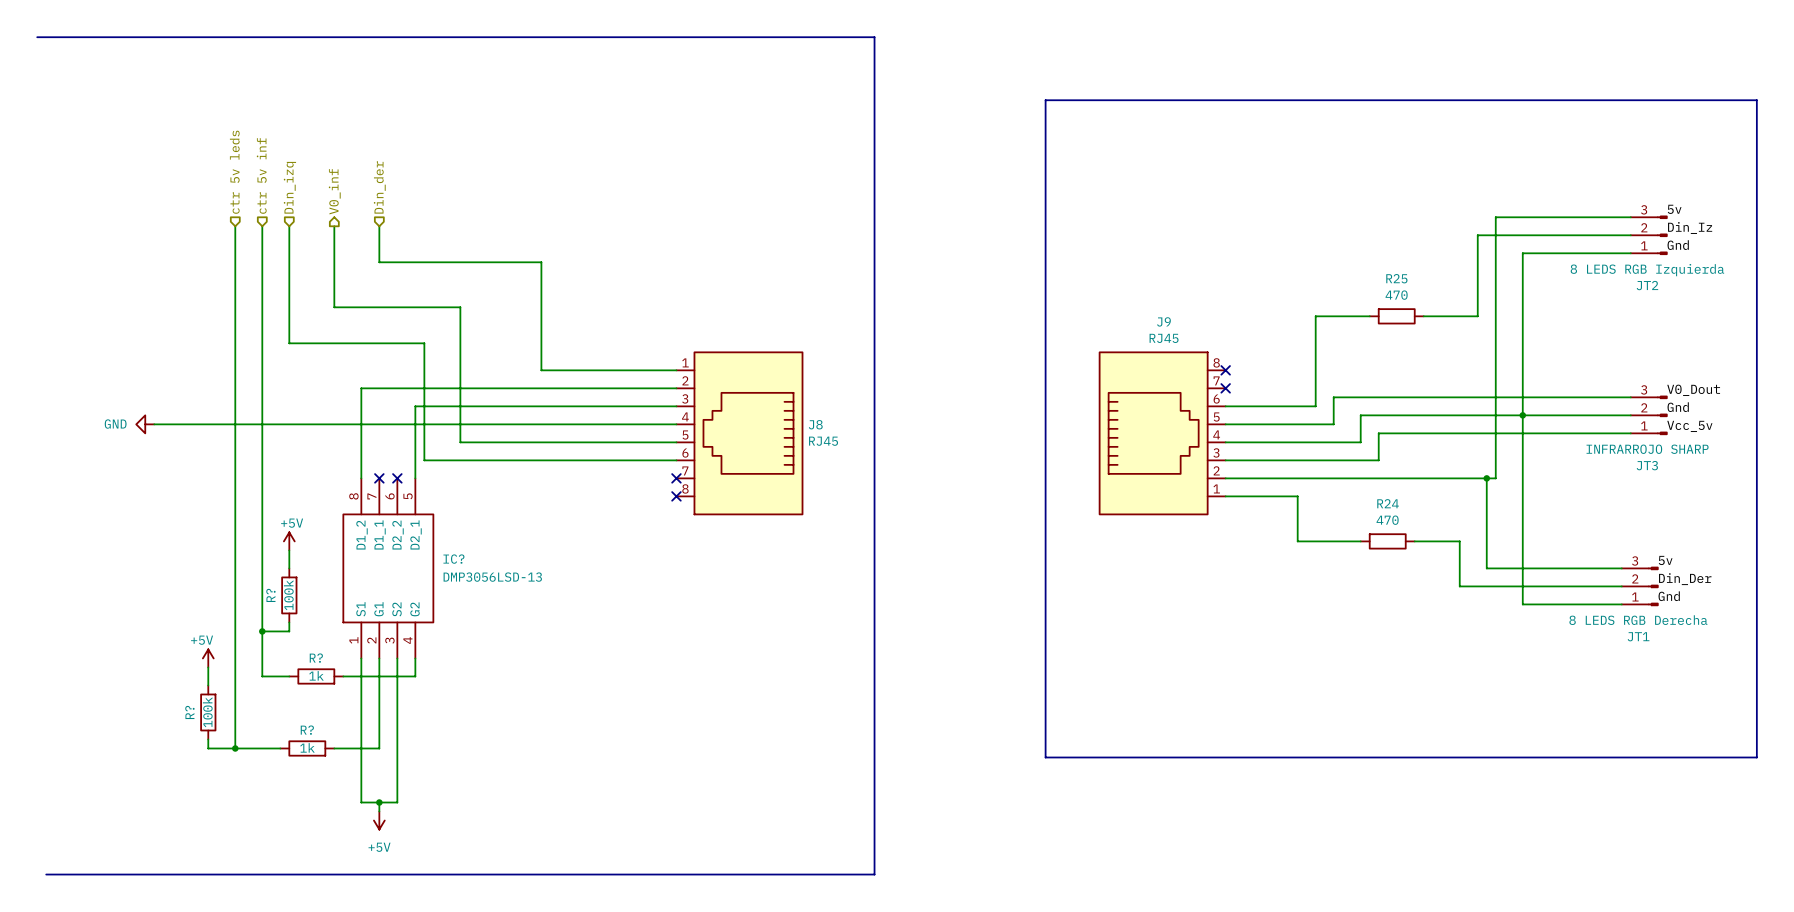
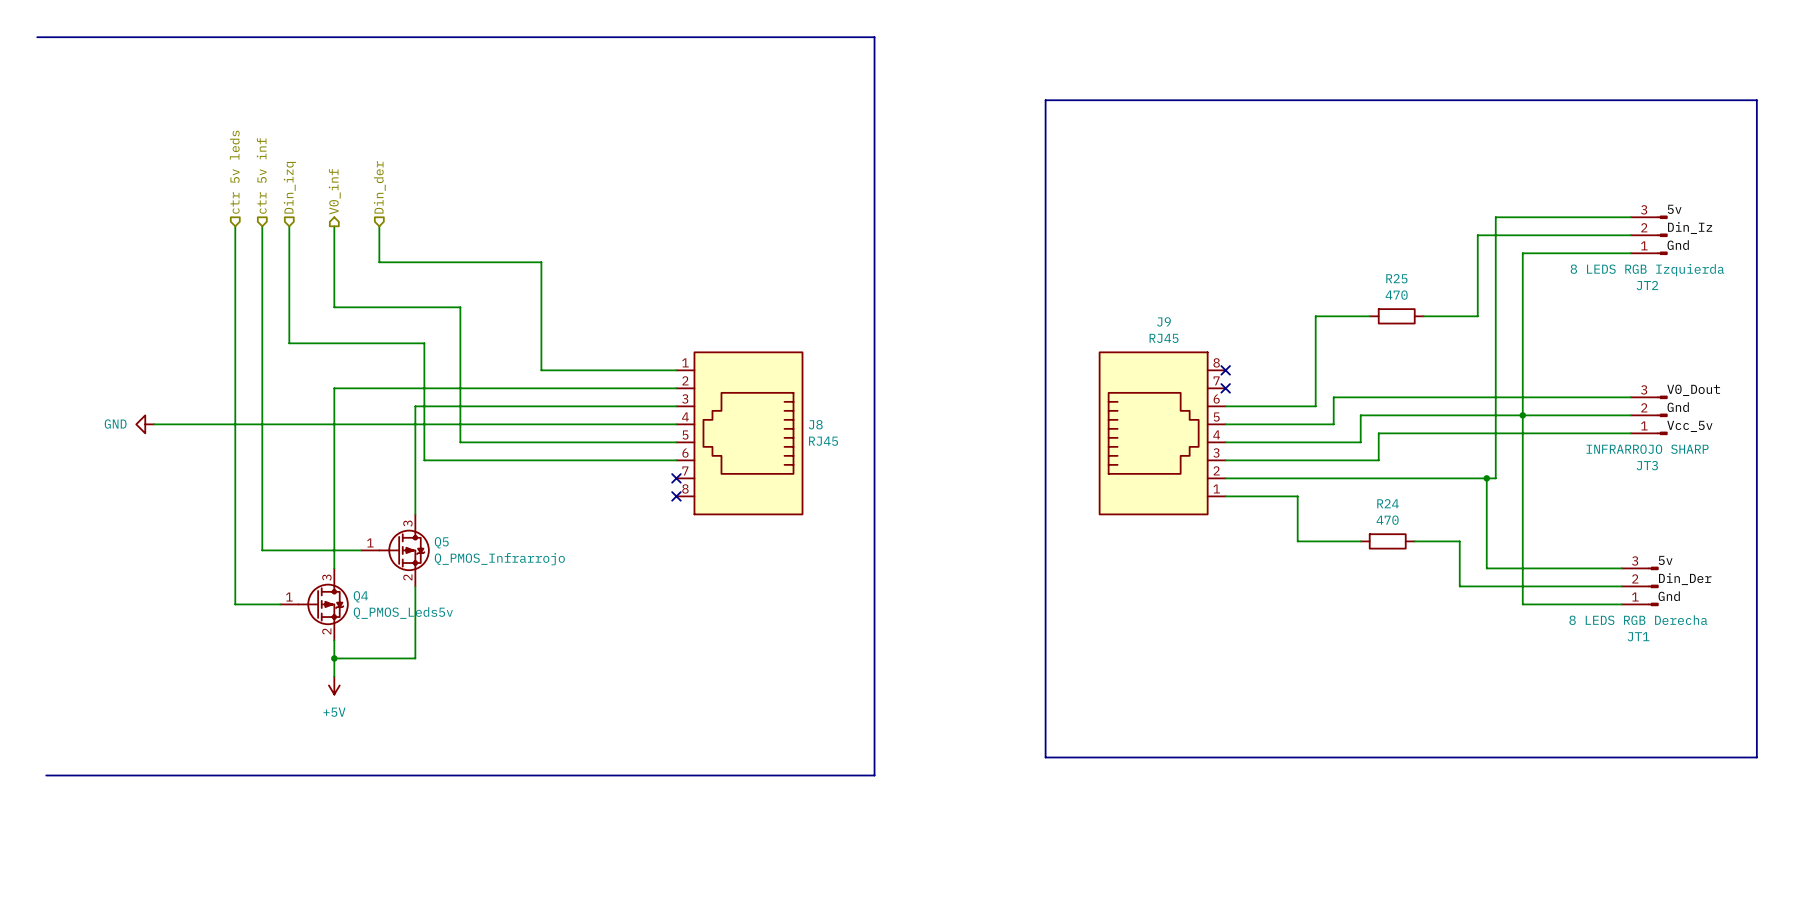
wire: (361, 388) (361, 478) -> (361, 388) (334, 388) (334, 568)
no-connect mark: (379, 478) -> none
no-connect mark: (397, 478) -> none
power symbol: +5V (289, 541) -> none
wire: (262, 550) (262, 676) (289, 676) -> (262, 550) (361, 550)
wire: (289, 550) (289, 568) -> none
Q5: none -> Q_PMOS_Infrarrojo (395, 550)
IC?: DMP3056LSD-13 (388, 568) -> none
wire: none -> (415, 586) (415, 658) (334, 658)
R?: 100k (289, 595) -> none
wire: (235, 604) (235, 748) -> (235, 604) (280, 604)
Q4: none -> Q_PMOS_Leds5v (314, 604)
wire: (289, 622) (289, 631) (262, 631) -> none
junction: (262, 631) -> none
wire: none -> (334, 640) (334, 676)
power symbol: +5V (208, 658) -> none
junction: none -> (334, 658)
wire: (361, 658) (361, 802) (397, 802) (397, 658) -> none
wire: (379, 658) (379, 748) (334, 748) -> none
wire: (415, 658) (415, 676) (343, 676) -> none
wire: (208, 667) (208, 685) -> none
R?: 1k (316, 676) -> none
power symbol: none -> +5V (334, 685)
R?: 100k (208, 712) -> none
wire: (208, 739) (208, 748) (280, 748) -> none
junction: (235, 748) -> none
R?: 1k (307, 748) -> none
line: (874, 775) (874, 874) (46, 874) -> (874, 775) (46, 775)
wire: (379, 802) (379, 811) -> none
junction: (379, 802) -> none
power symbol: +5V (379, 820) -> none

